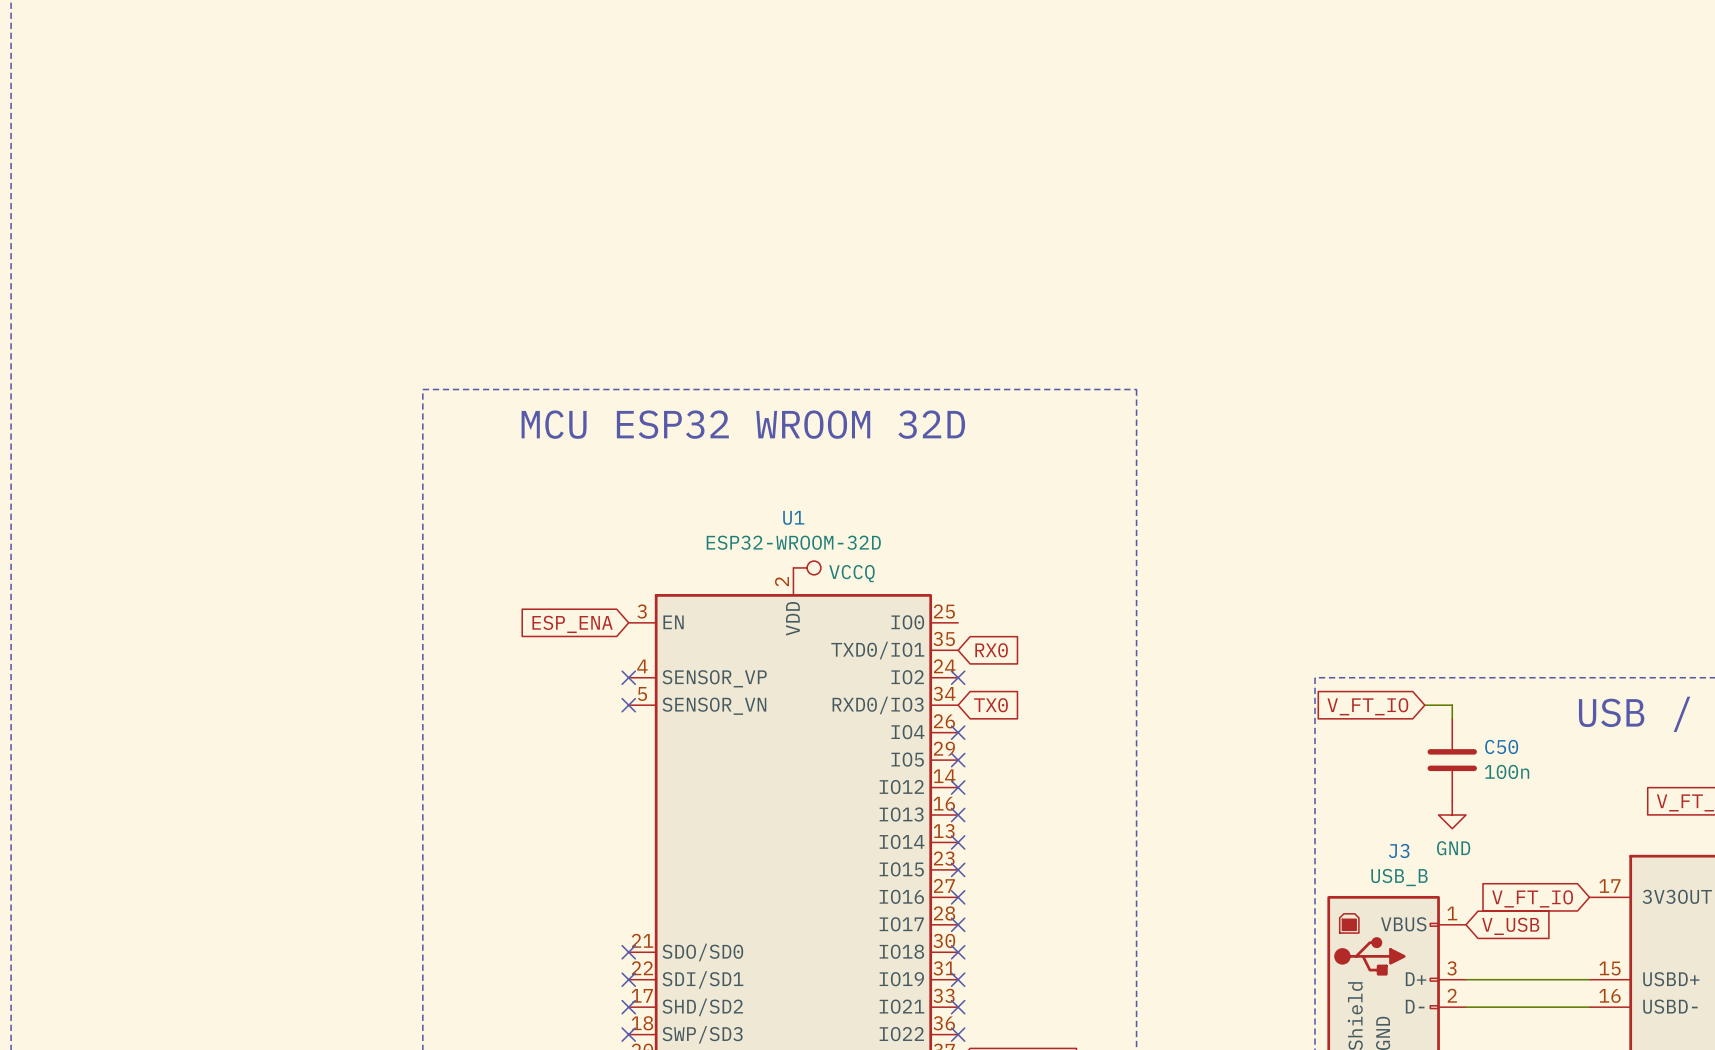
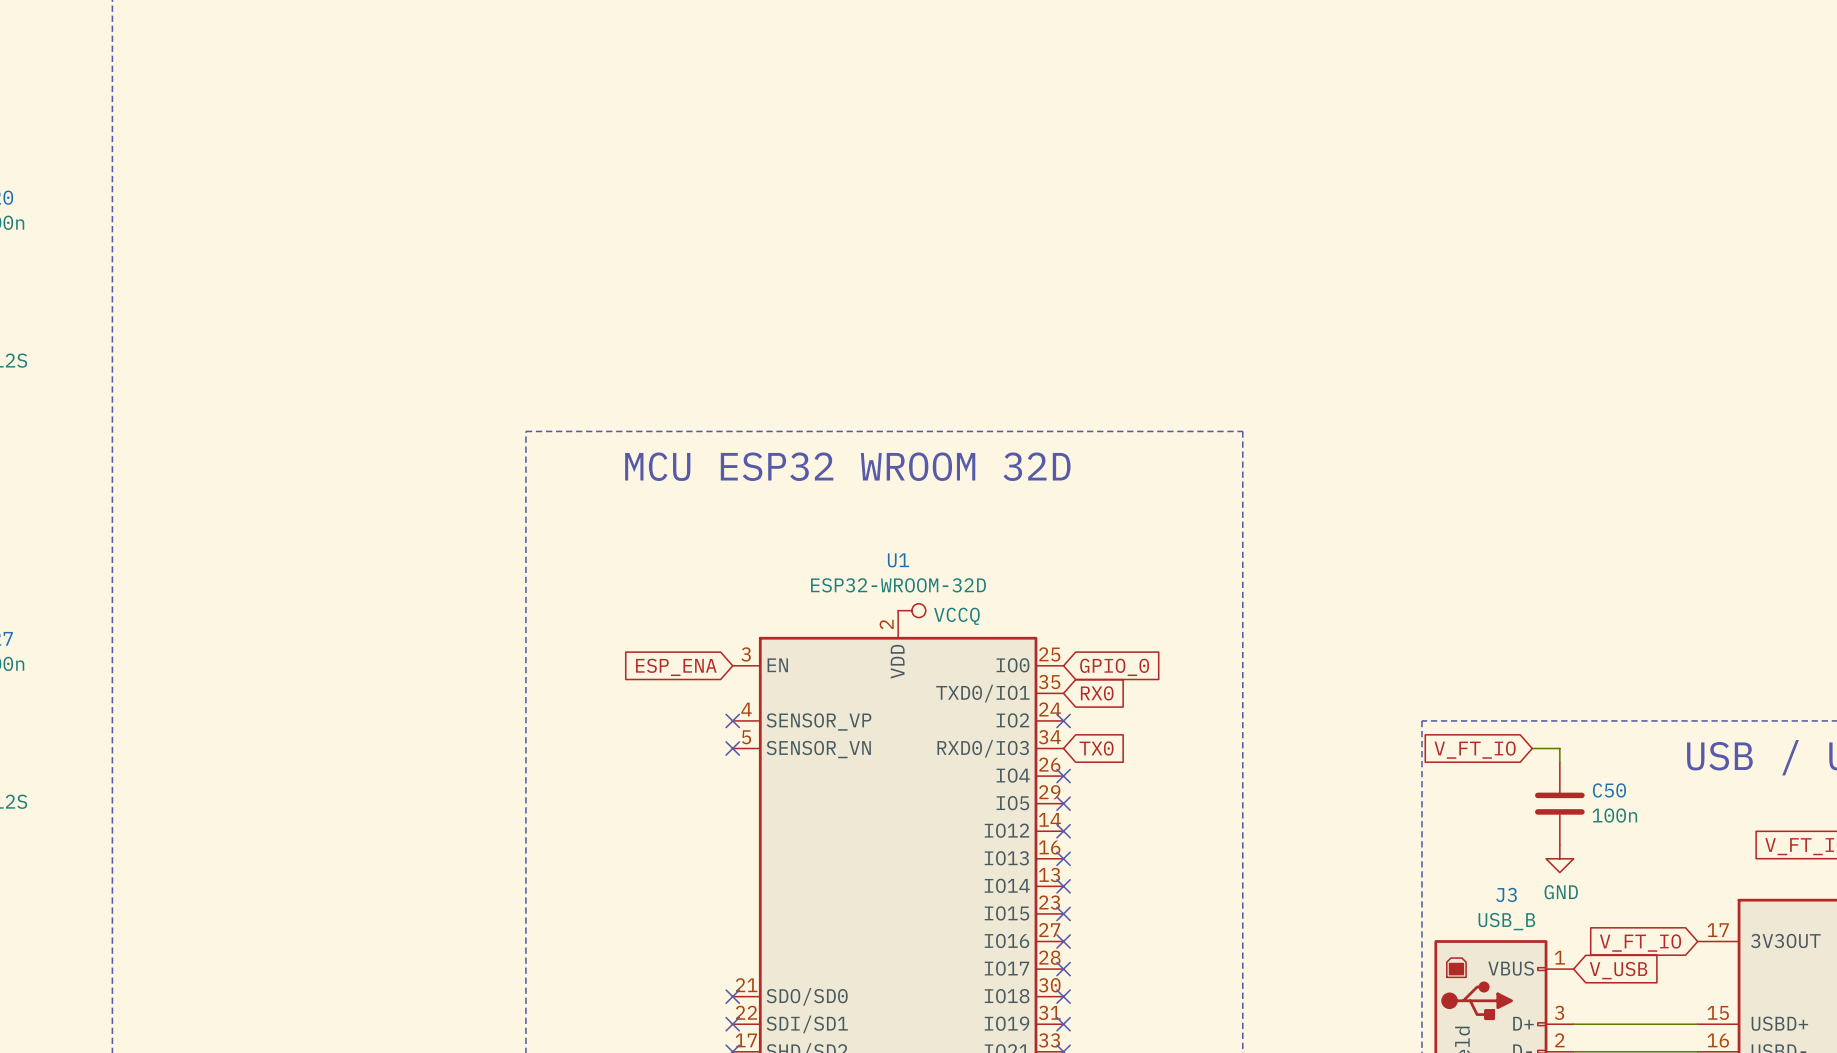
global label: none -> GPIO_0 (1114, 667)

